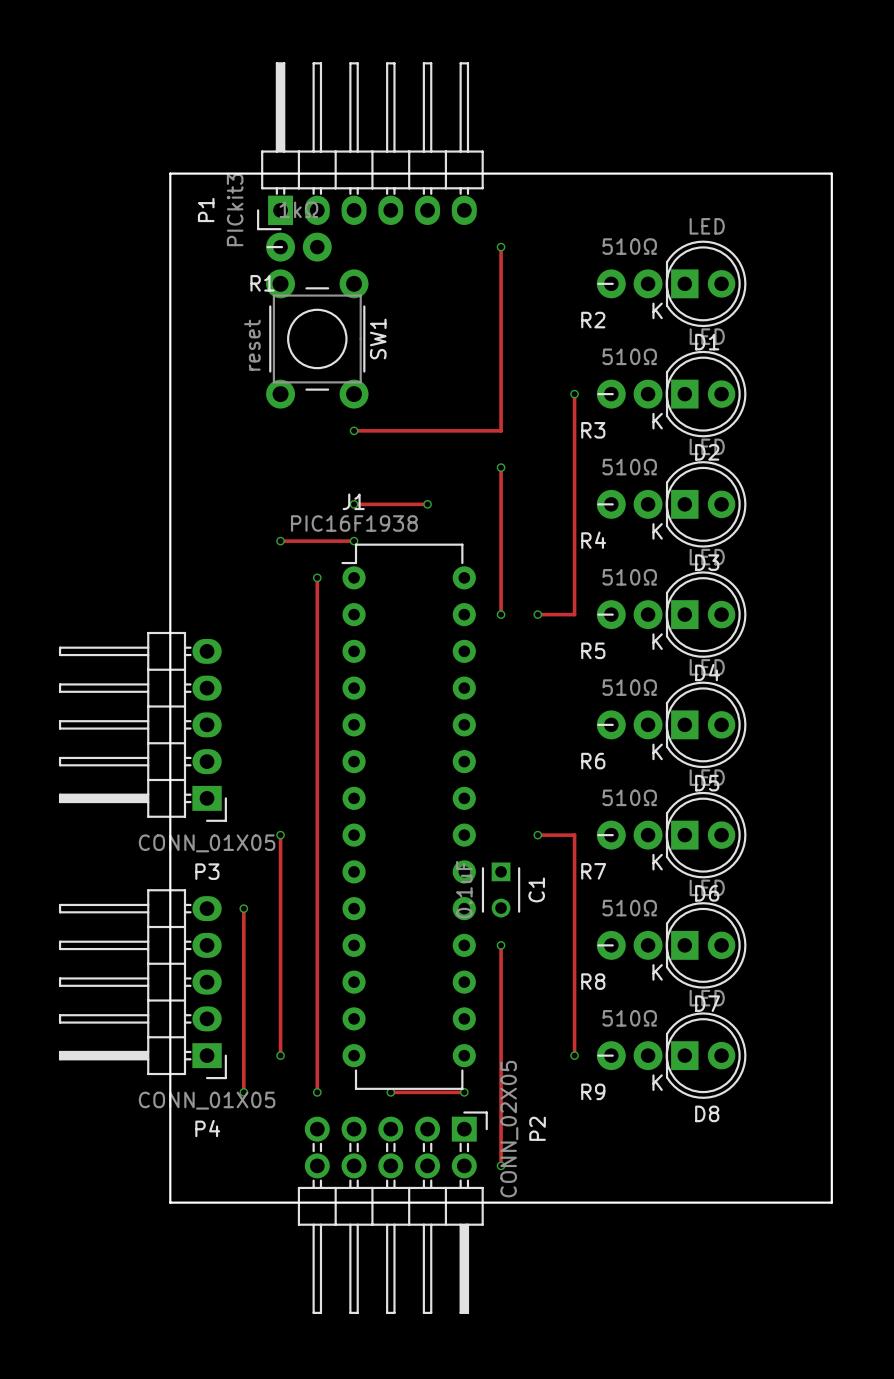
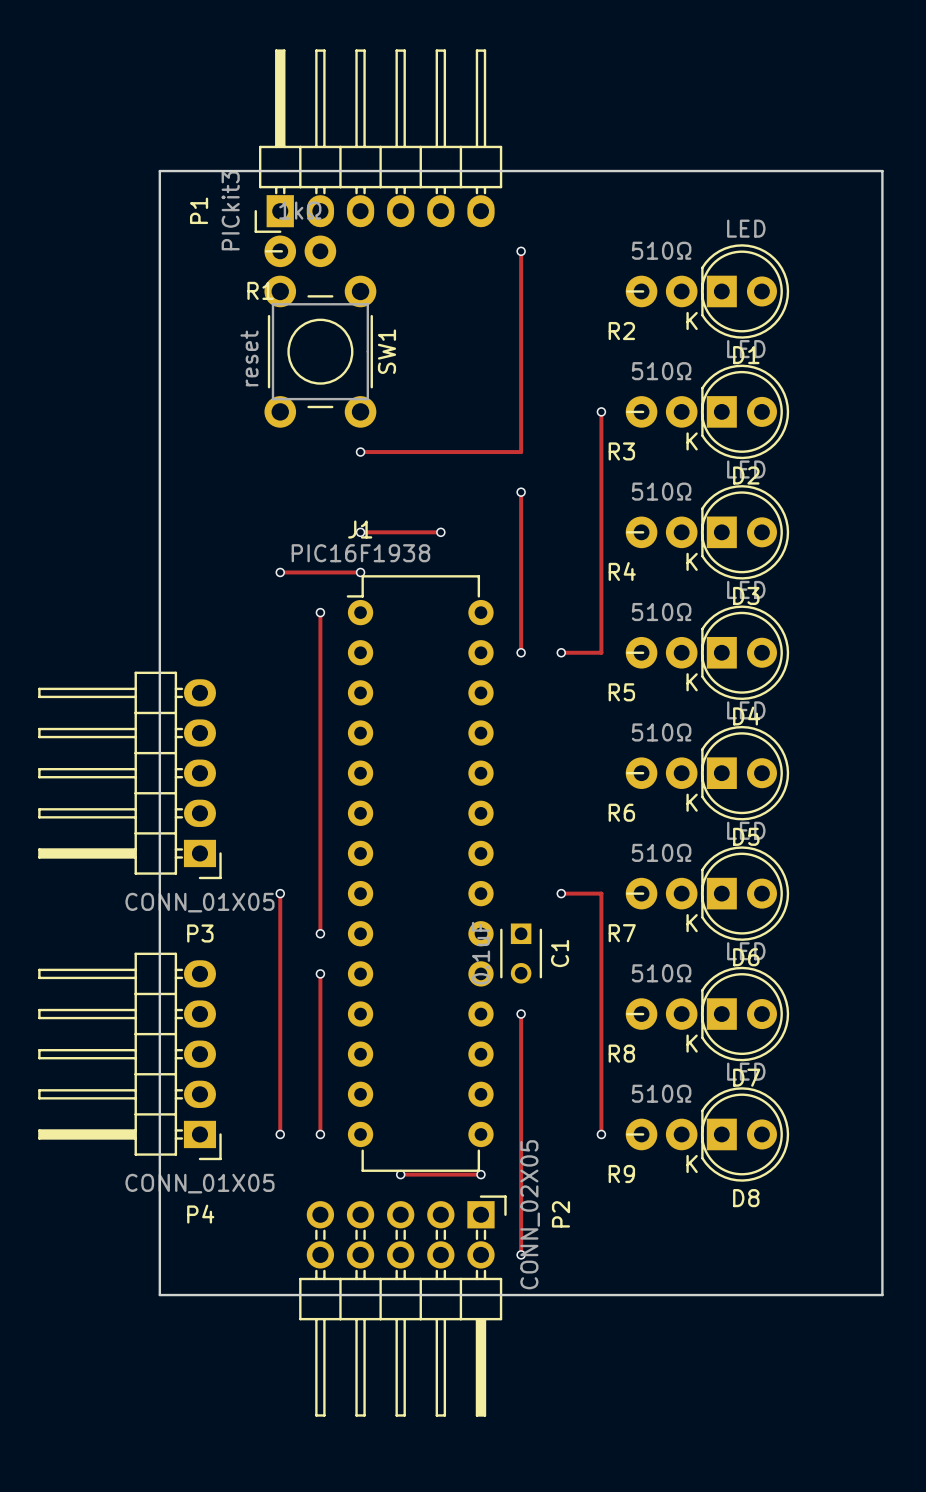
track: (317, 871) (317, 908) -> none
via: none -> (320, 933)
track: (243, 908) (243, 1092) -> none
via: (243, 908) -> none
via: none -> (320, 973)
track: (317, 1055) (317, 1092) -> none
via: (243, 1092) -> none
via position: (317, 1092) -> (320, 1134)

